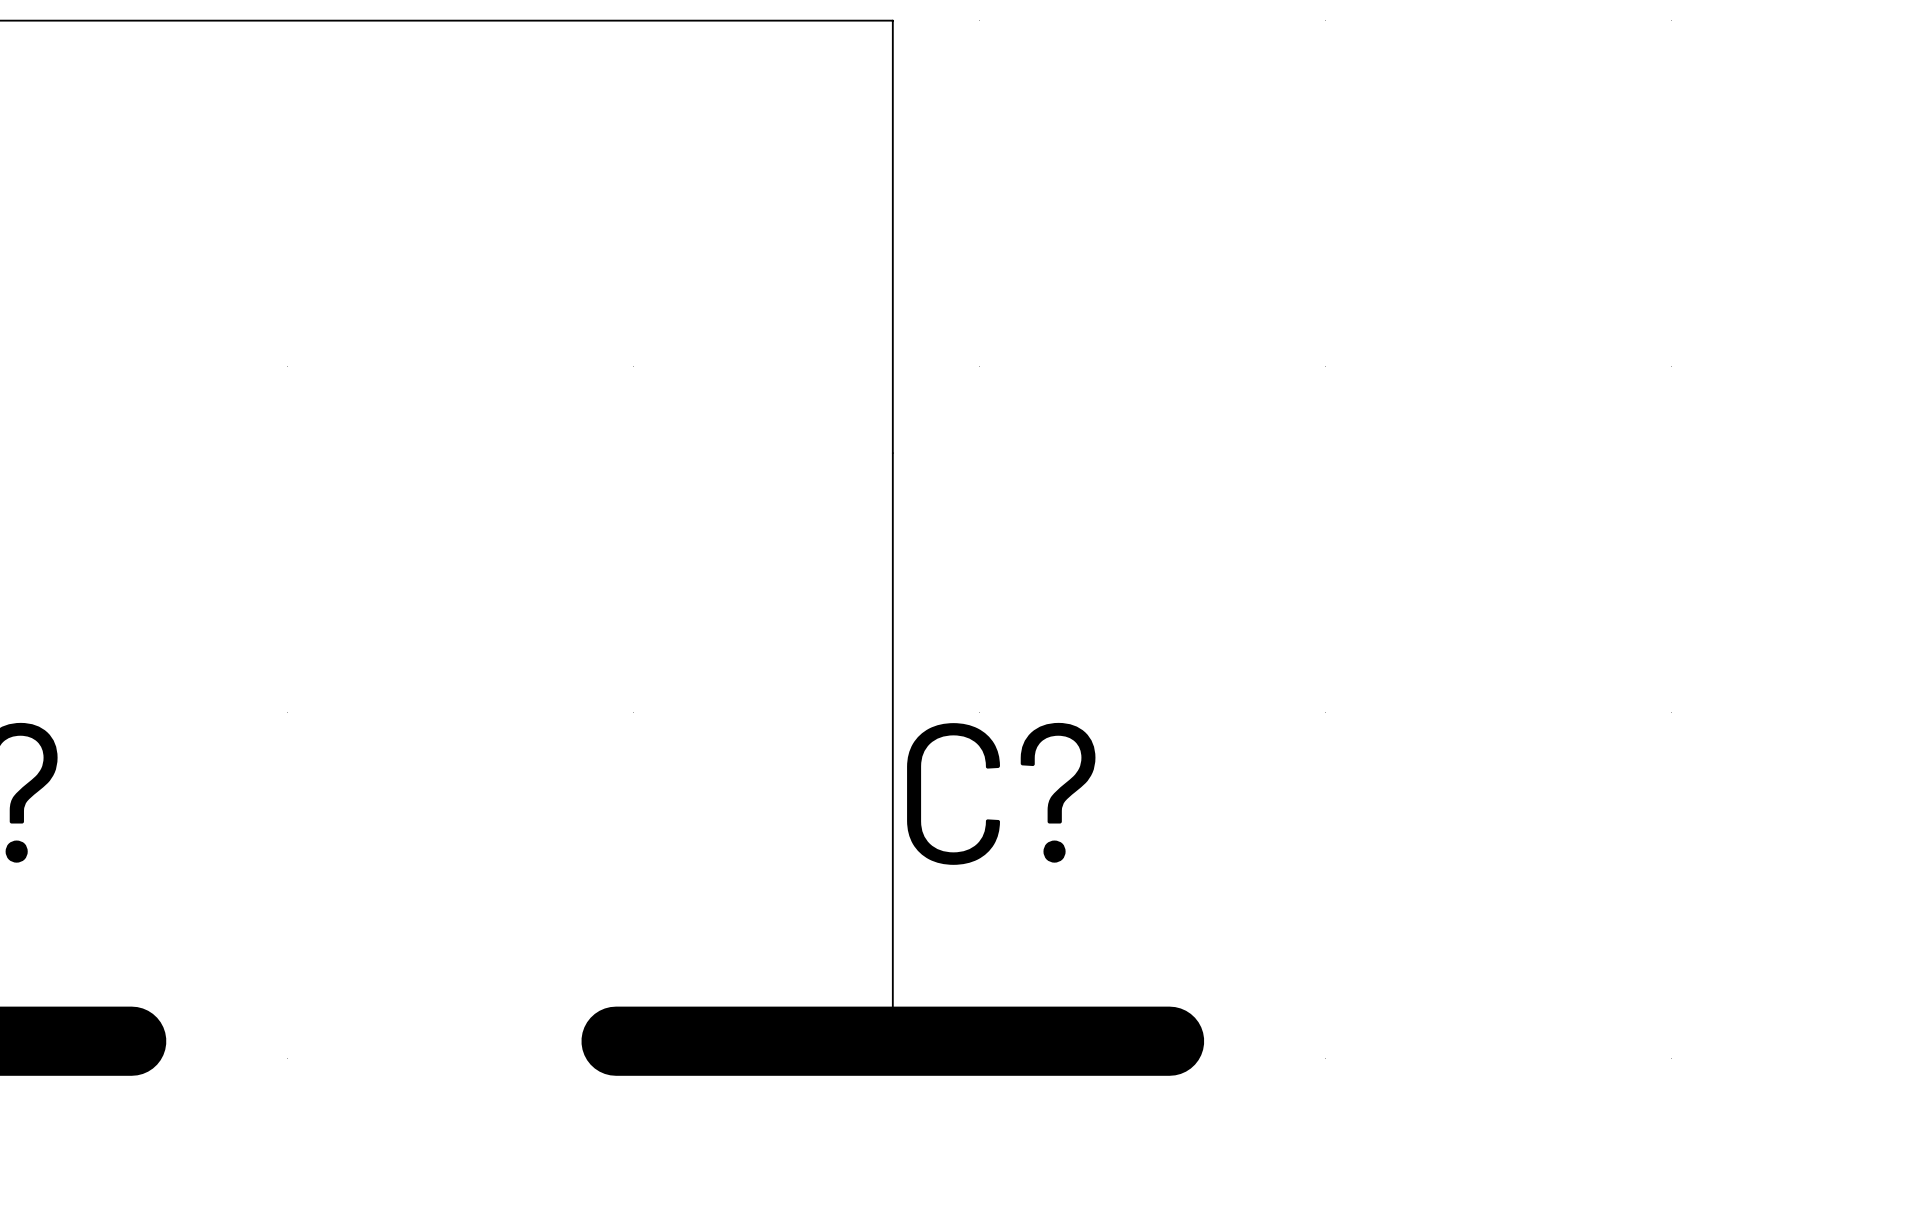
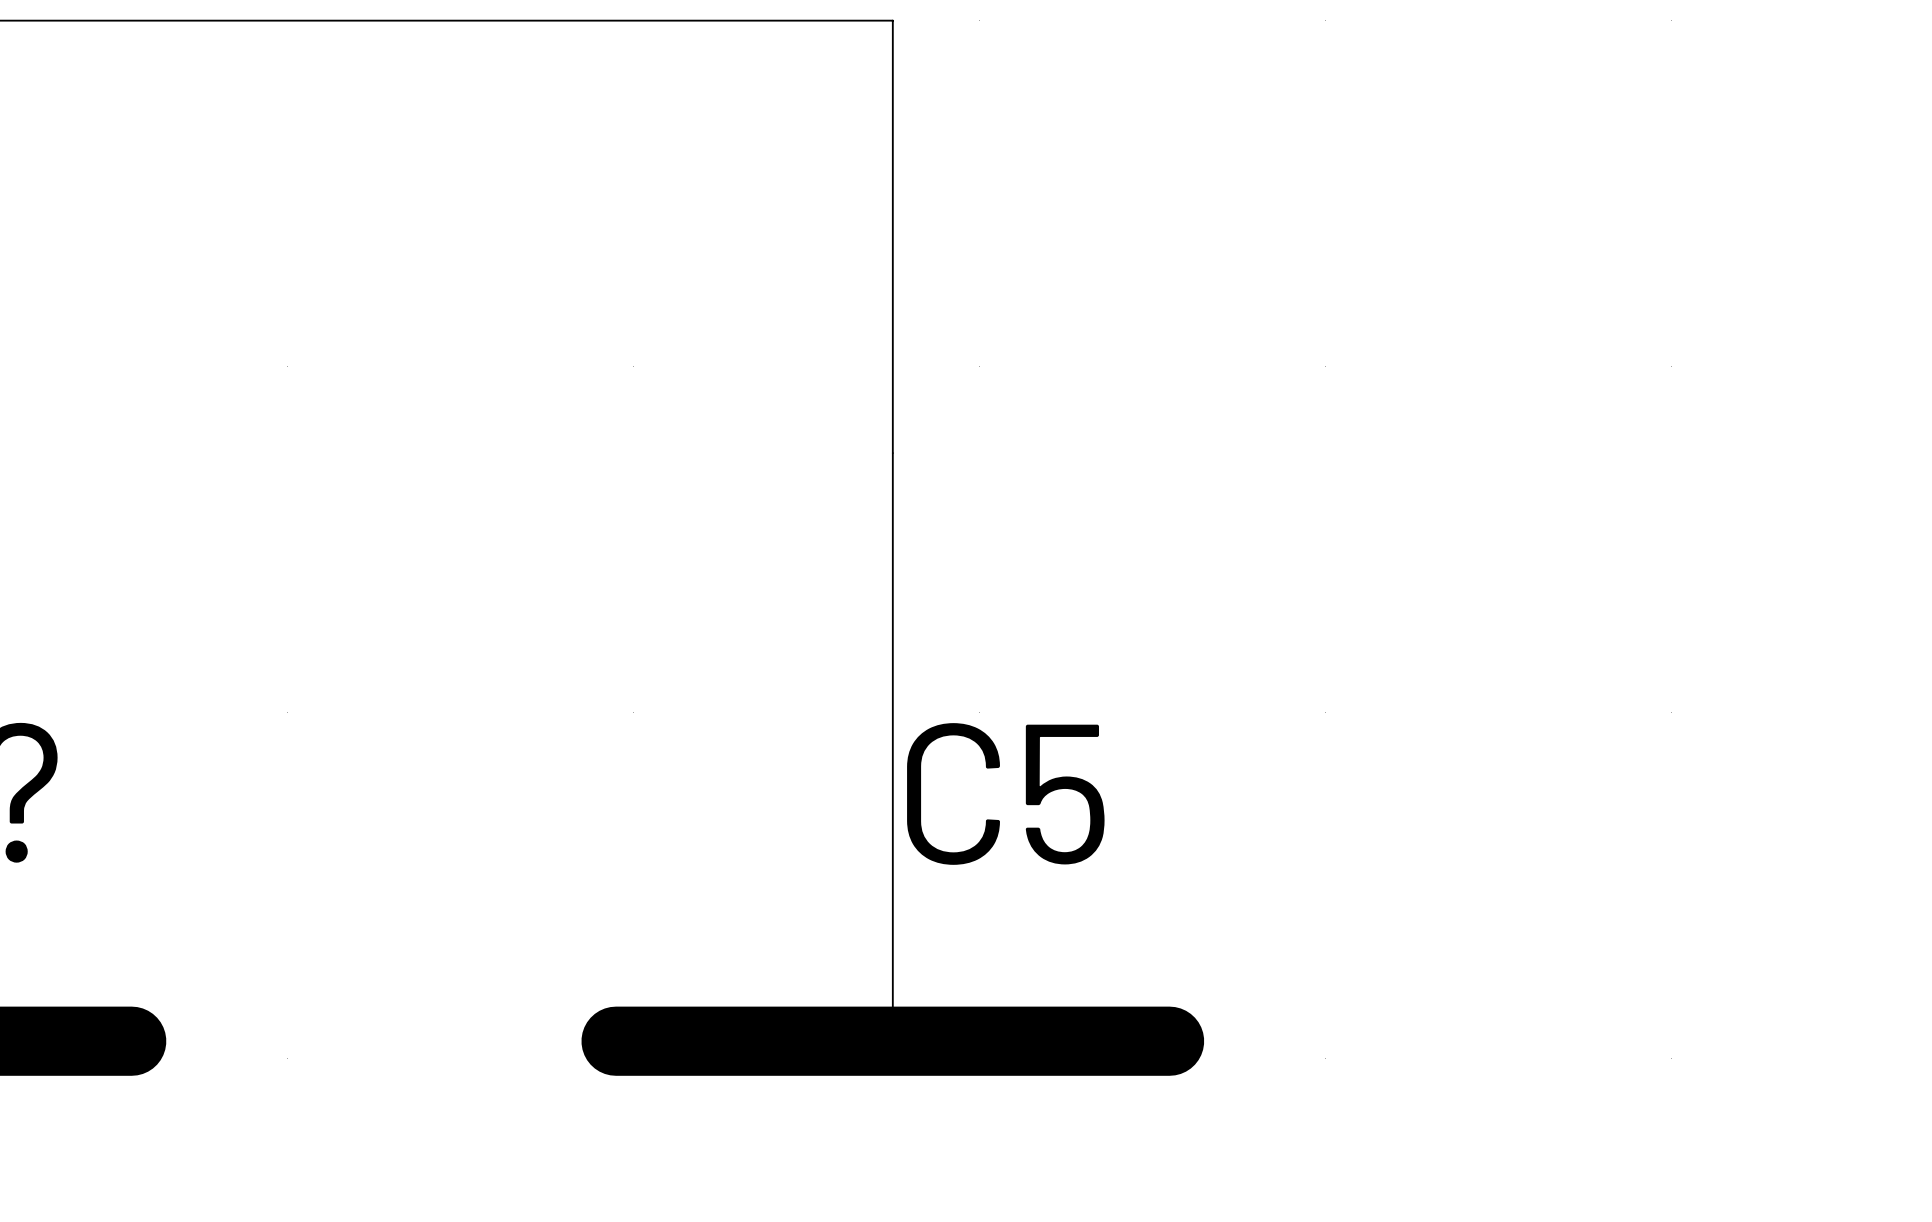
C? name: C? (1001, 793) -> C5 (1005, 793)

